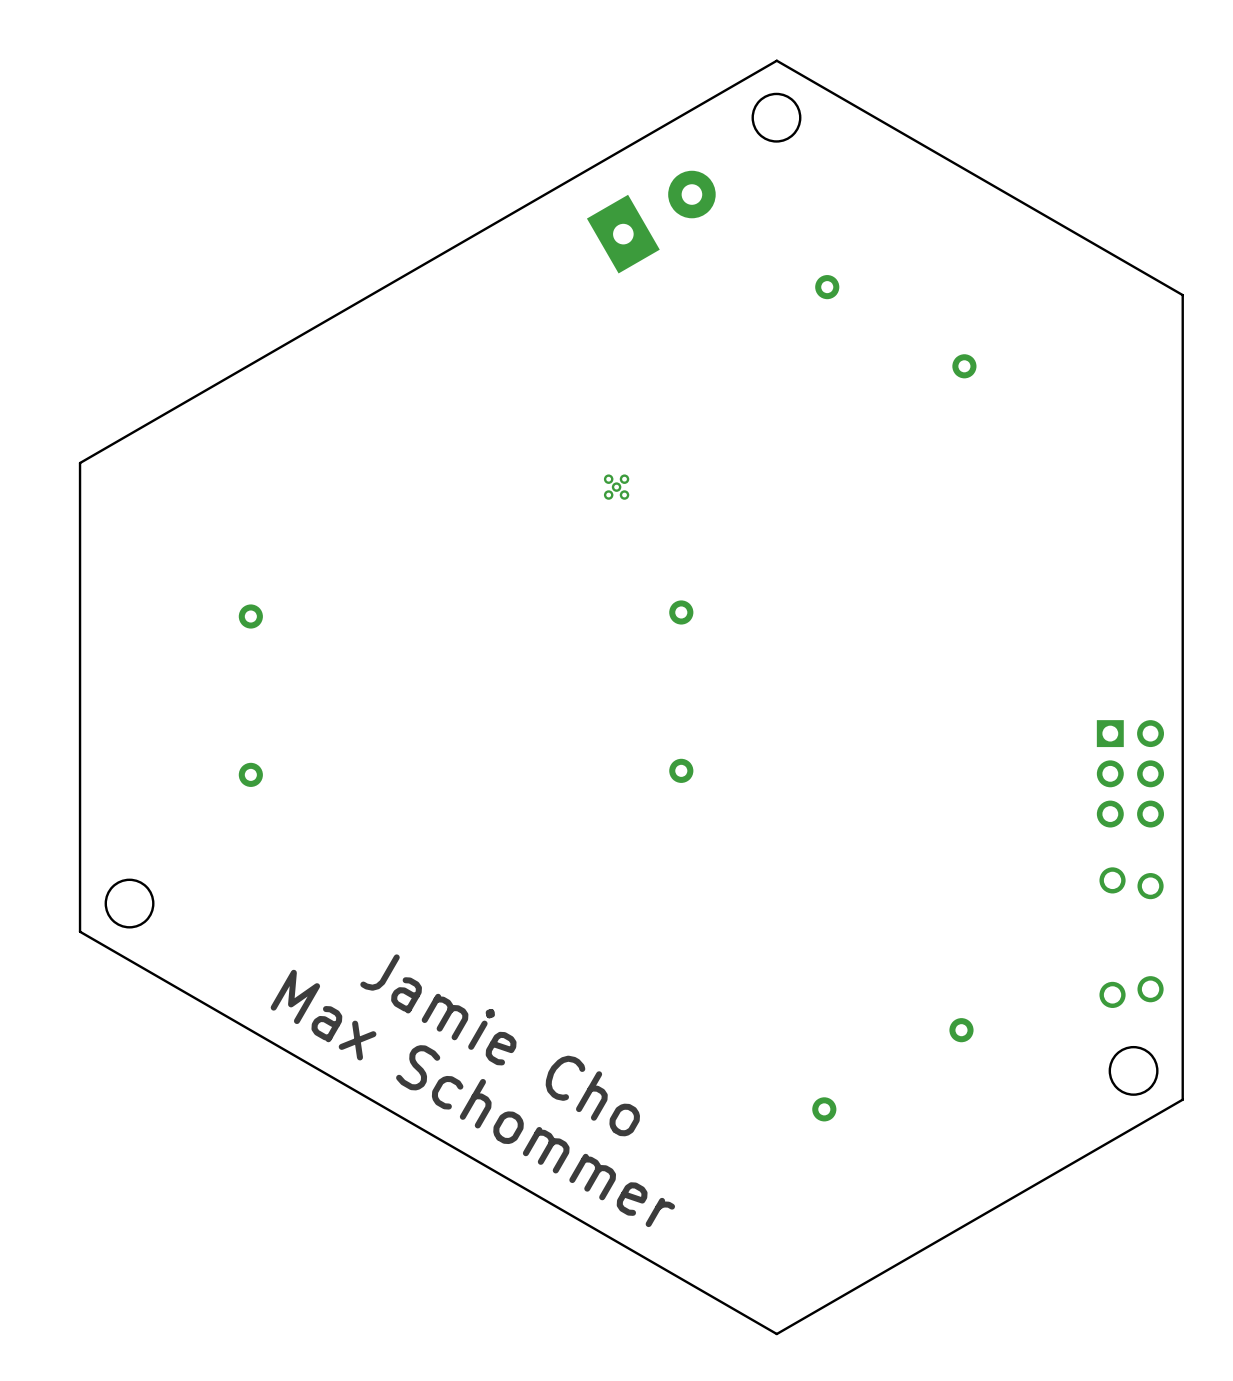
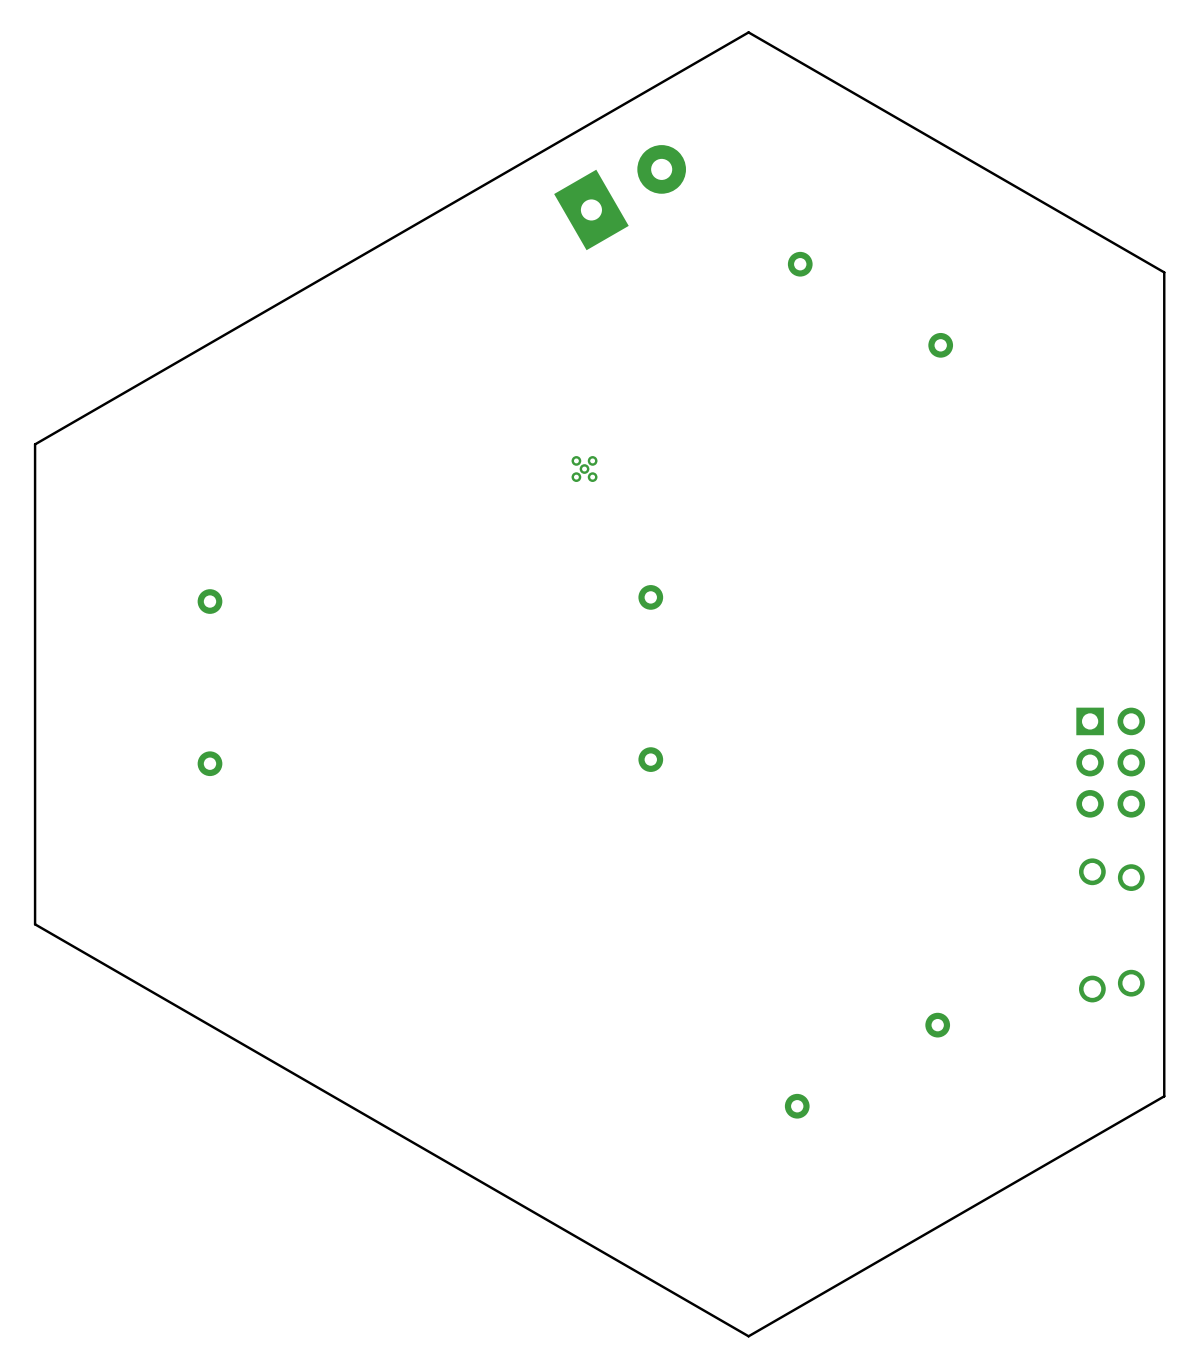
round board edge: [751, 92, 802, 143] -> none
round board edge: [104, 878, 155, 929] -> none
text: Jamie Cho (500, 1045) -> none
round board edge: [1108, 1045, 1159, 1096] -> none
text: Max Schommer (472, 1098) -> none

